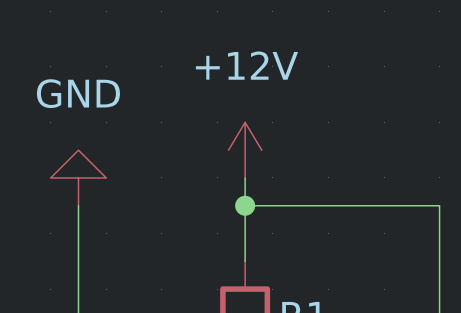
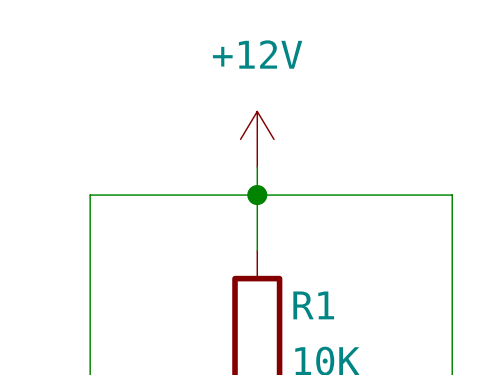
power symbol: GND (78, 177) -> none
wire: none -> (90, 195) (257, 195)

